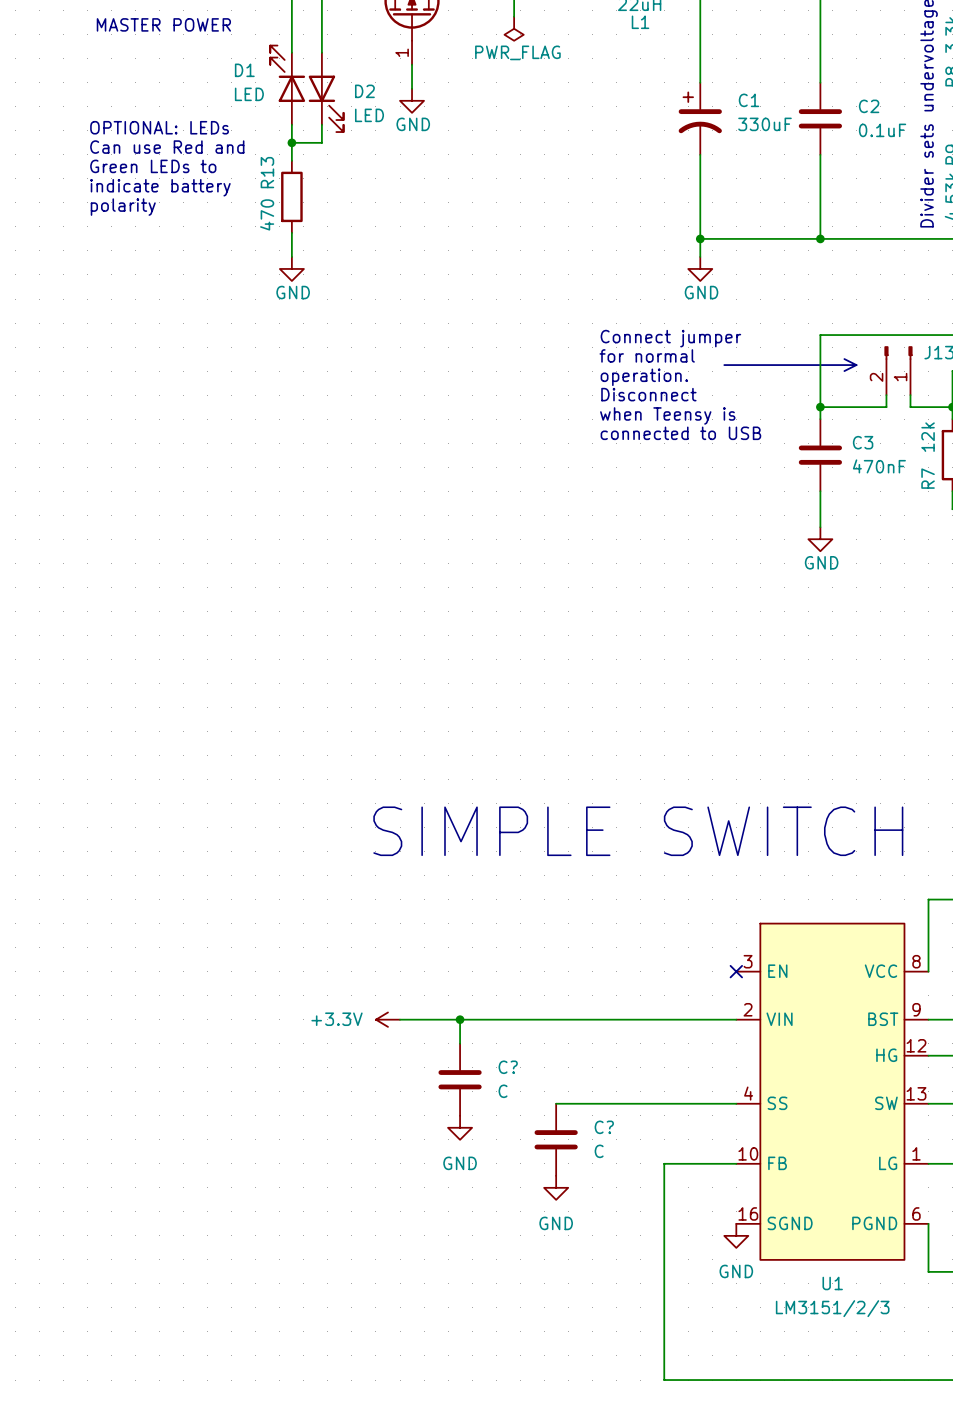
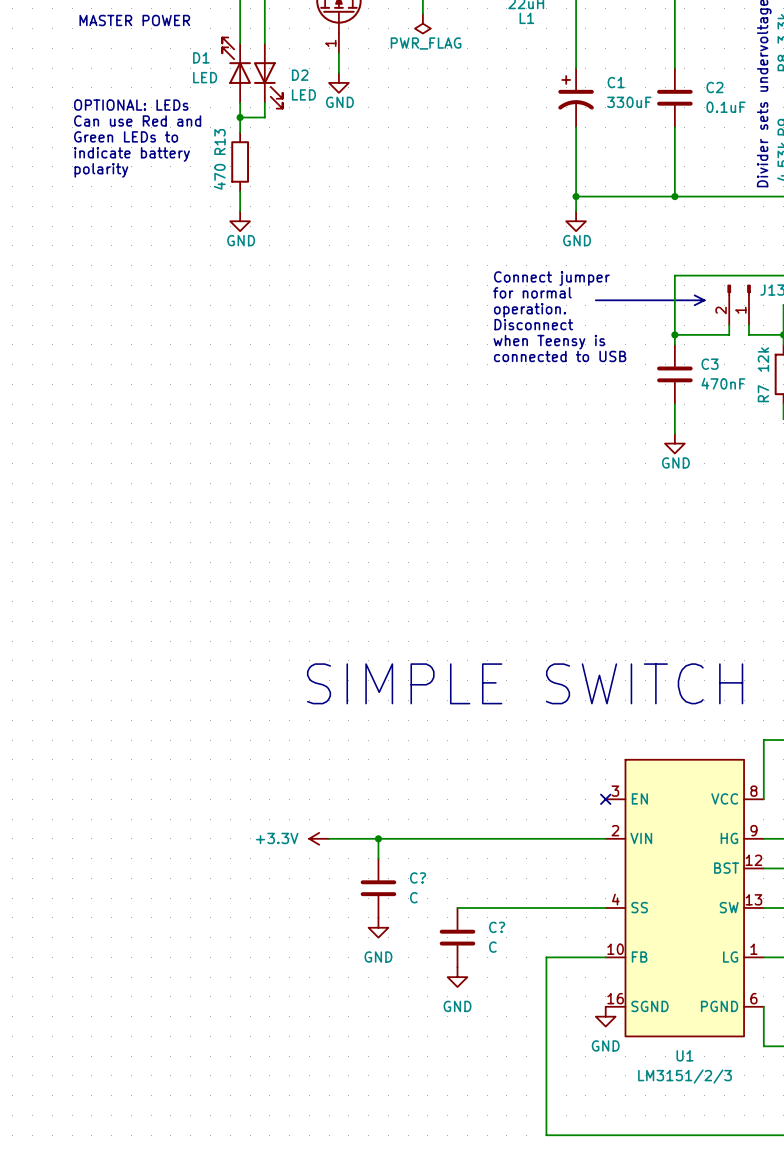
U1 pin name: BST (883, 1019) -> HG (729, 838)
U1 pin name: HG (886, 1055) -> BST (726, 868)

